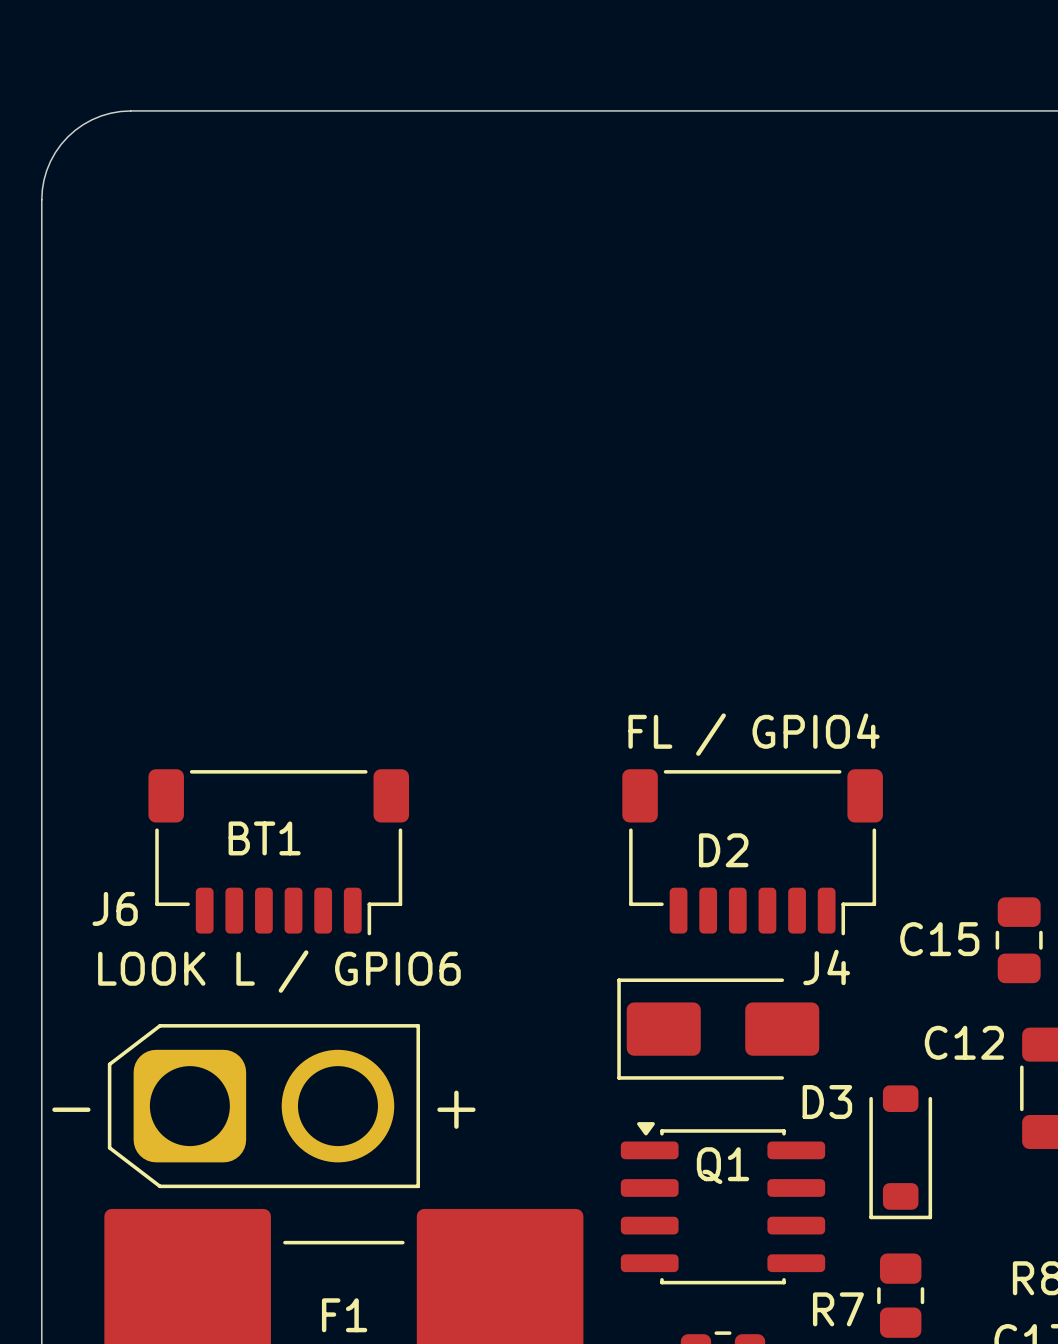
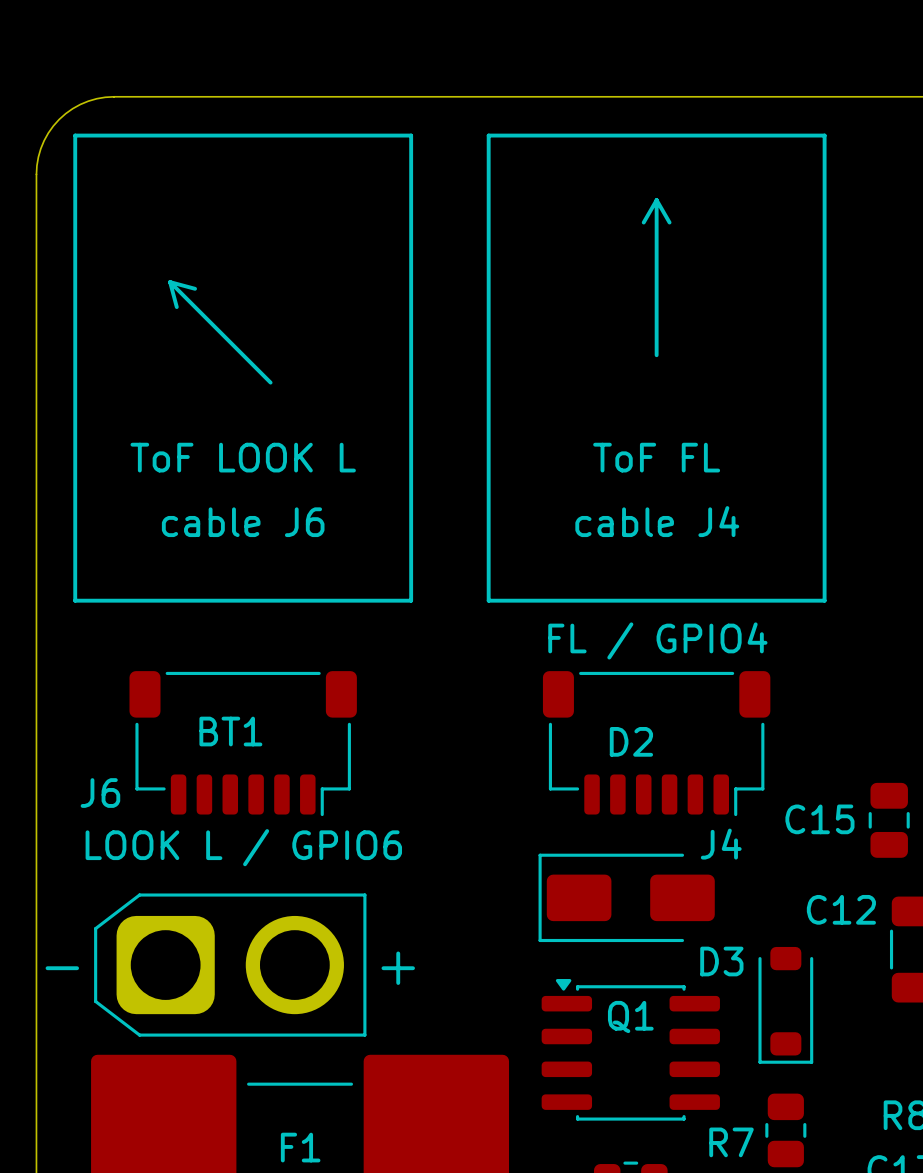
line: none -> (75, 135) (411, 135) (411, 600) (75, 600) (75, 135)
line: none -> (488, 135) (824, 135) (824, 600) (488, 600) (488, 135)
line: none -> (656, 200) (643, 222)
line: none -> (656, 200) (669, 222)
line: none -> (656, 200) (656, 355)
line: none -> (170, 282) (176, 307)
line: none -> (170, 282) (195, 288)
line: none -> (170, 282) (270, 382)
text: none -> ToF LOOK L (243, 457)
text: none -> ToF FL (656, 457)
text: none -> cable J4 (657, 521)
text: none -> cable J6 (243, 522)

